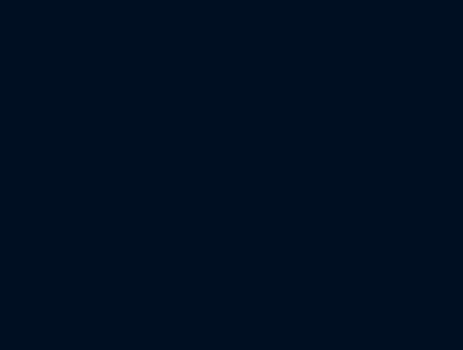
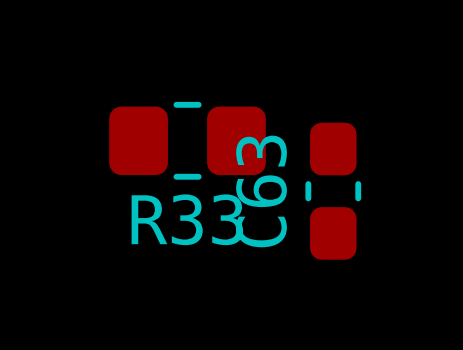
R33: none -> (187, 140)
C63: none -> (333, 191)

